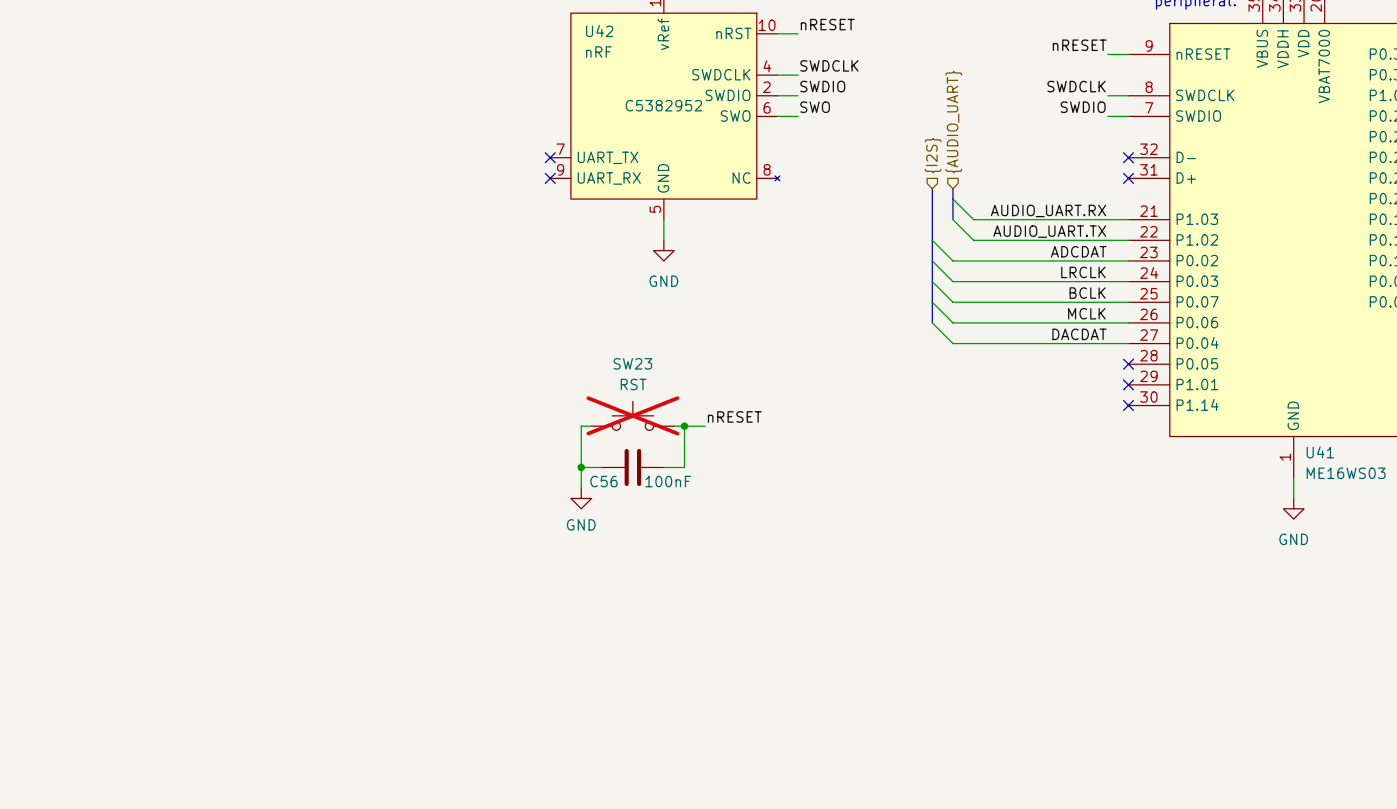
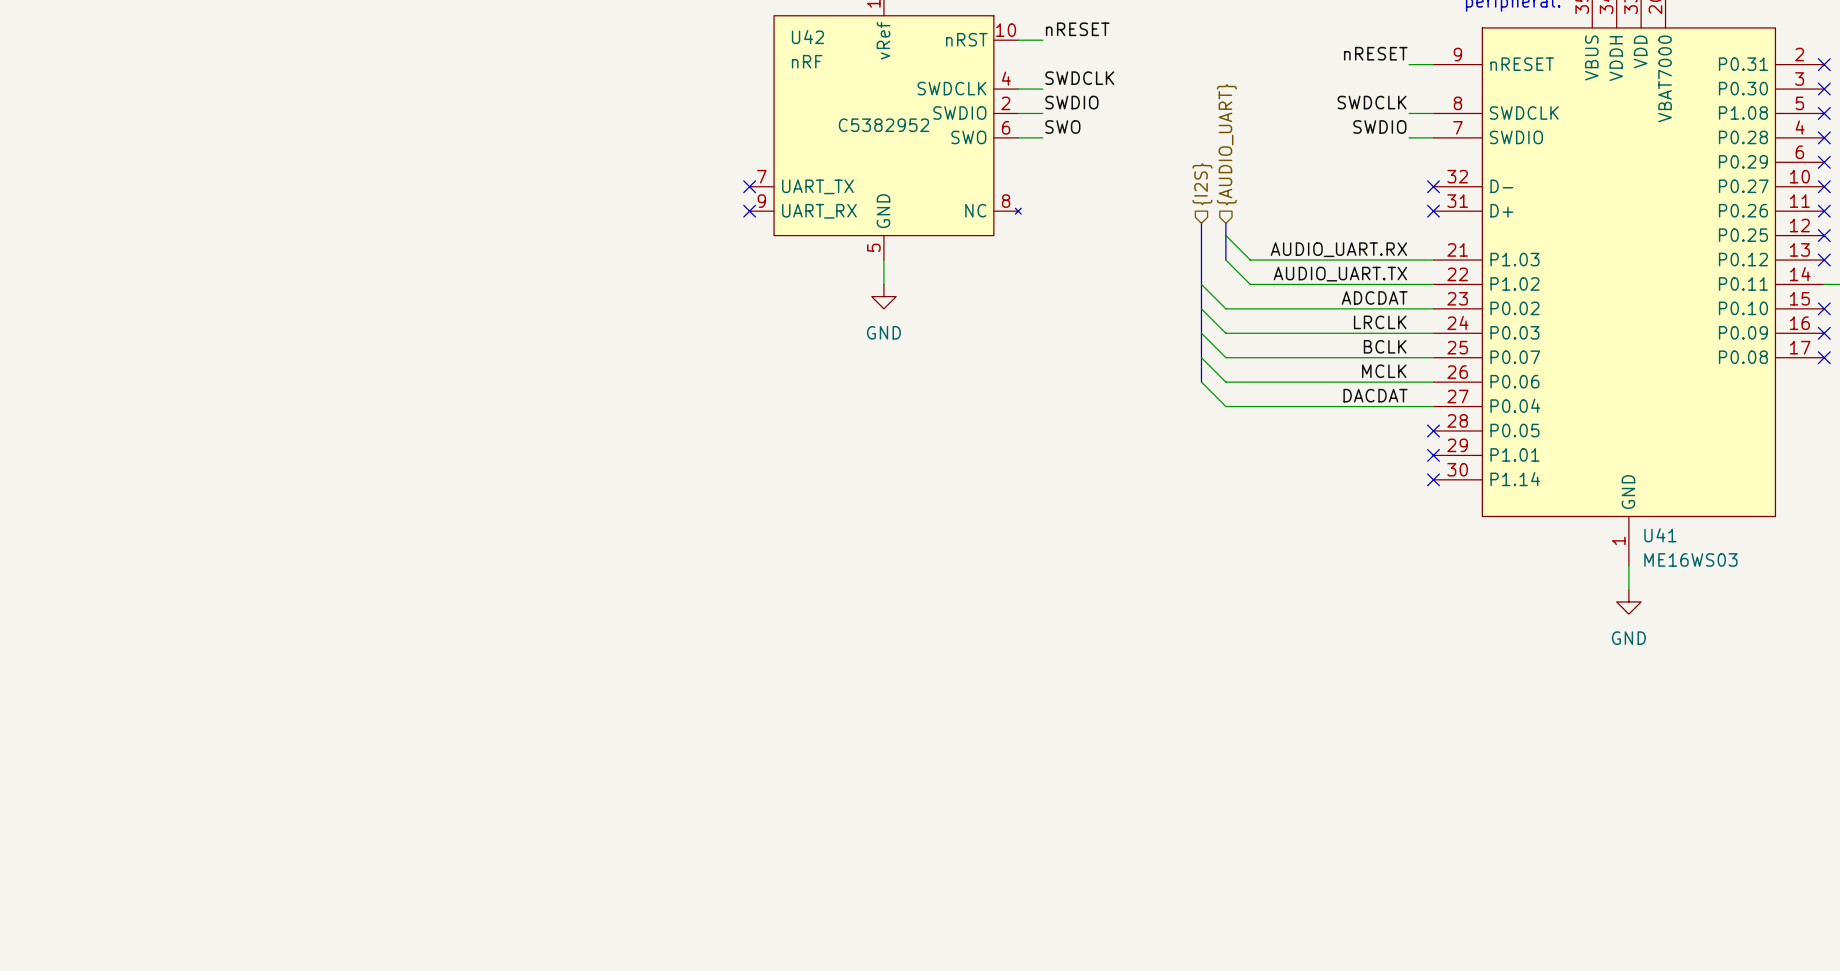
SW23: RST (632, 415) -> none
label: nRESET (734, 416) -> none
wire: (591, 426) (581, 426) (581, 488) -> none
wire: (674, 426) (705, 426) -> none
wire: (684, 426) (684, 467) (663, 467) -> none
junction: (684, 426) -> none
wire: (581, 467) (601, 467) -> none
junction: (581, 467) -> none
C56: 100nF (632, 467) -> none
power symbol: GND (581, 498) -> none

